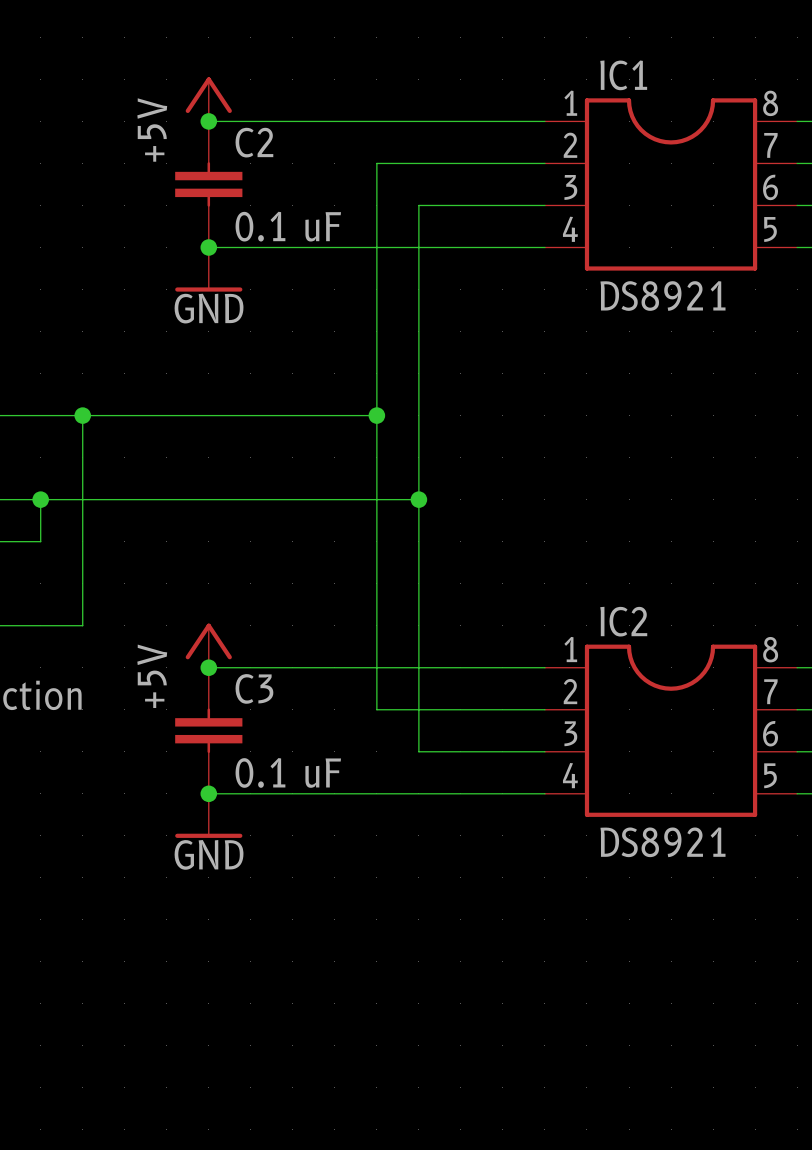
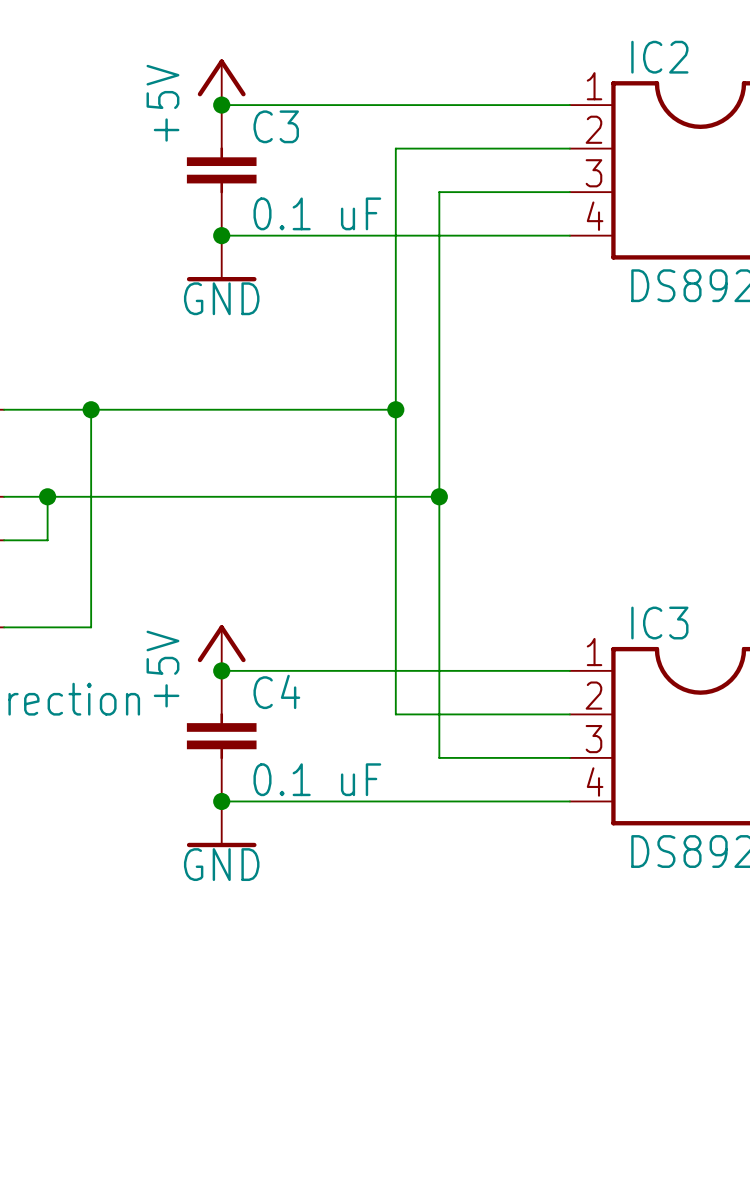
IC1 name: IC1 (623, 75) -> IC2 (659, 57)
C2 name: C2 (254, 142) -> C3 (276, 126)
IC2 name: IC2 (623, 621) -> IC3 (659, 623)
C3 name: C3 (254, 688) -> C4 (276, 691)

